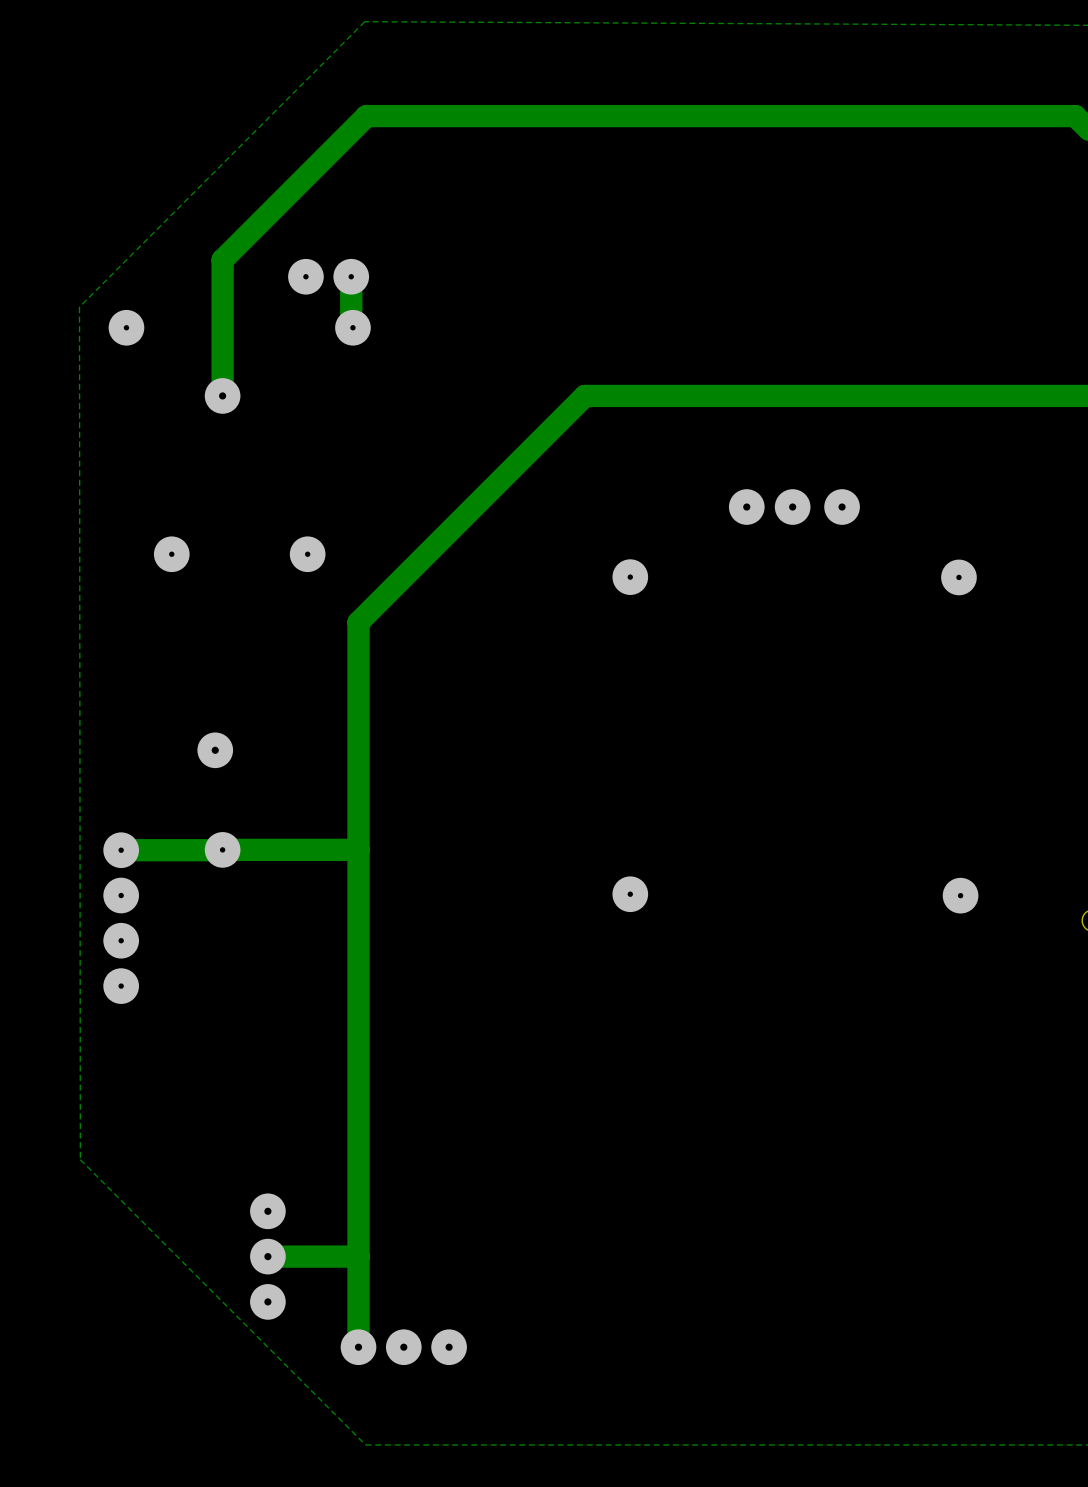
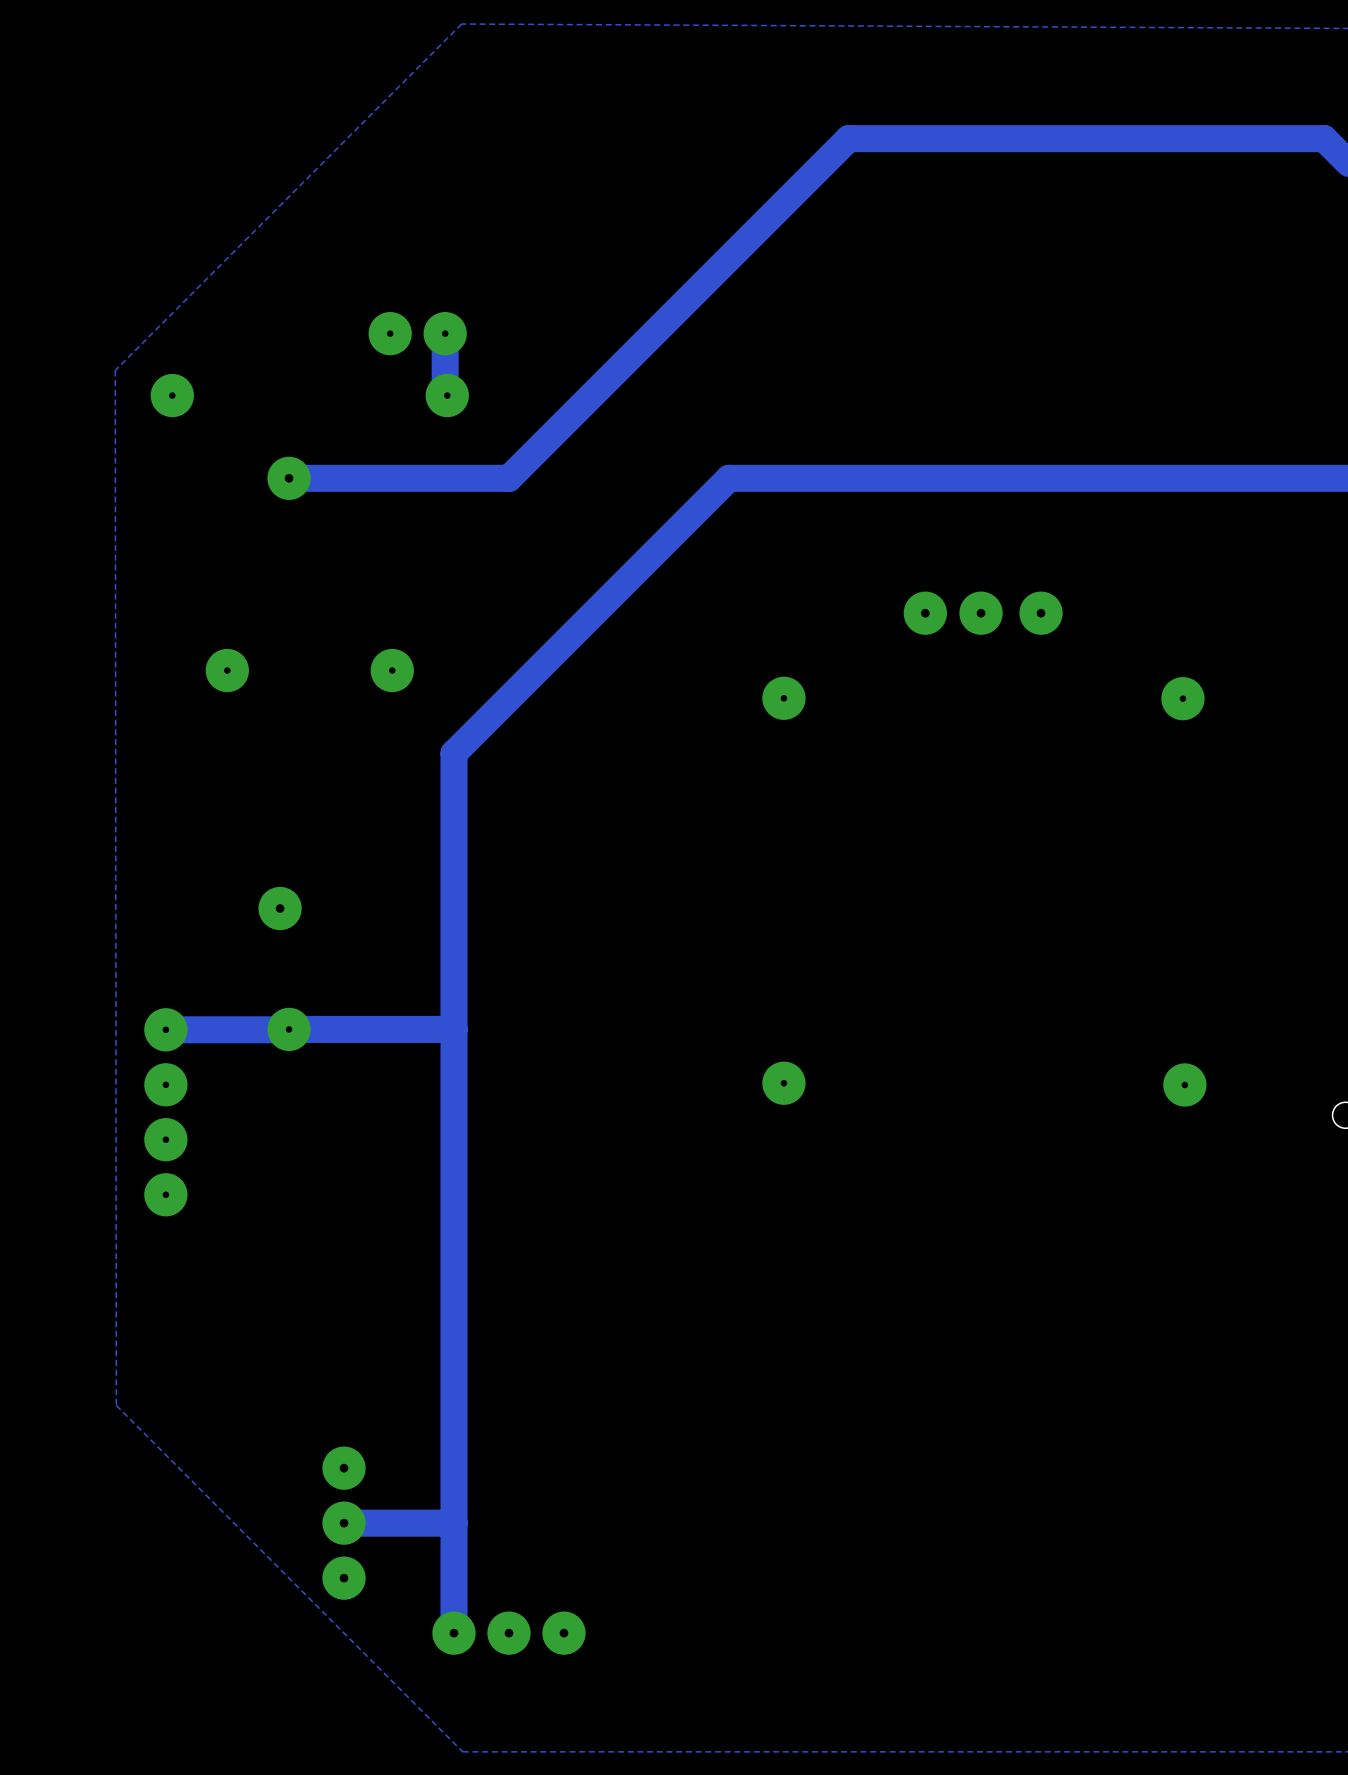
track: (683, 116) (366, 116) (222, 260) (222, 395) -> (848, 138) (509, 478) (289, 478)

